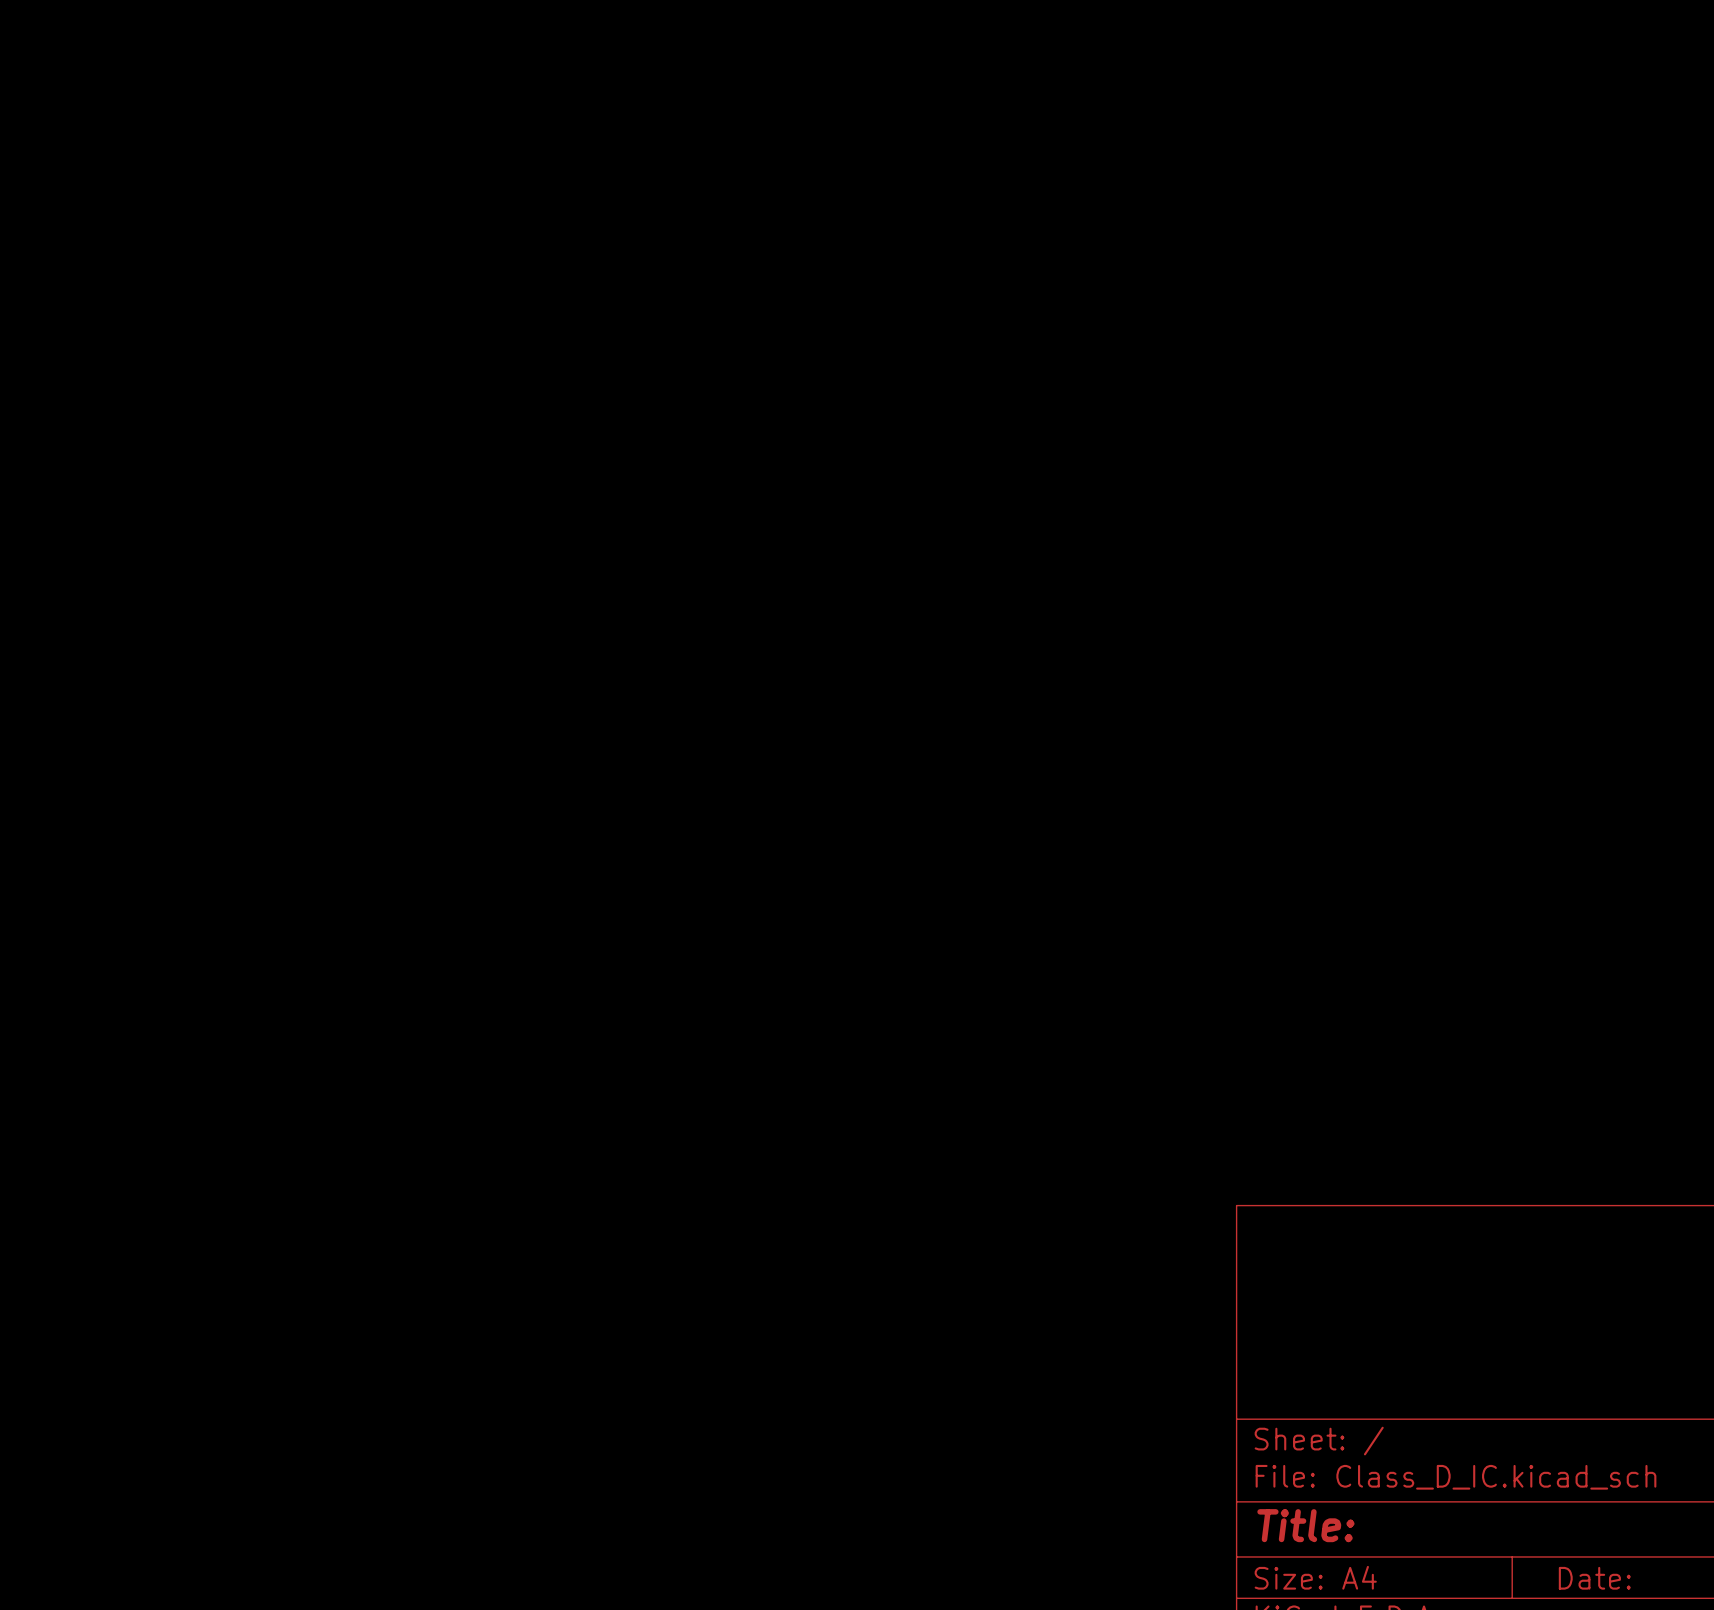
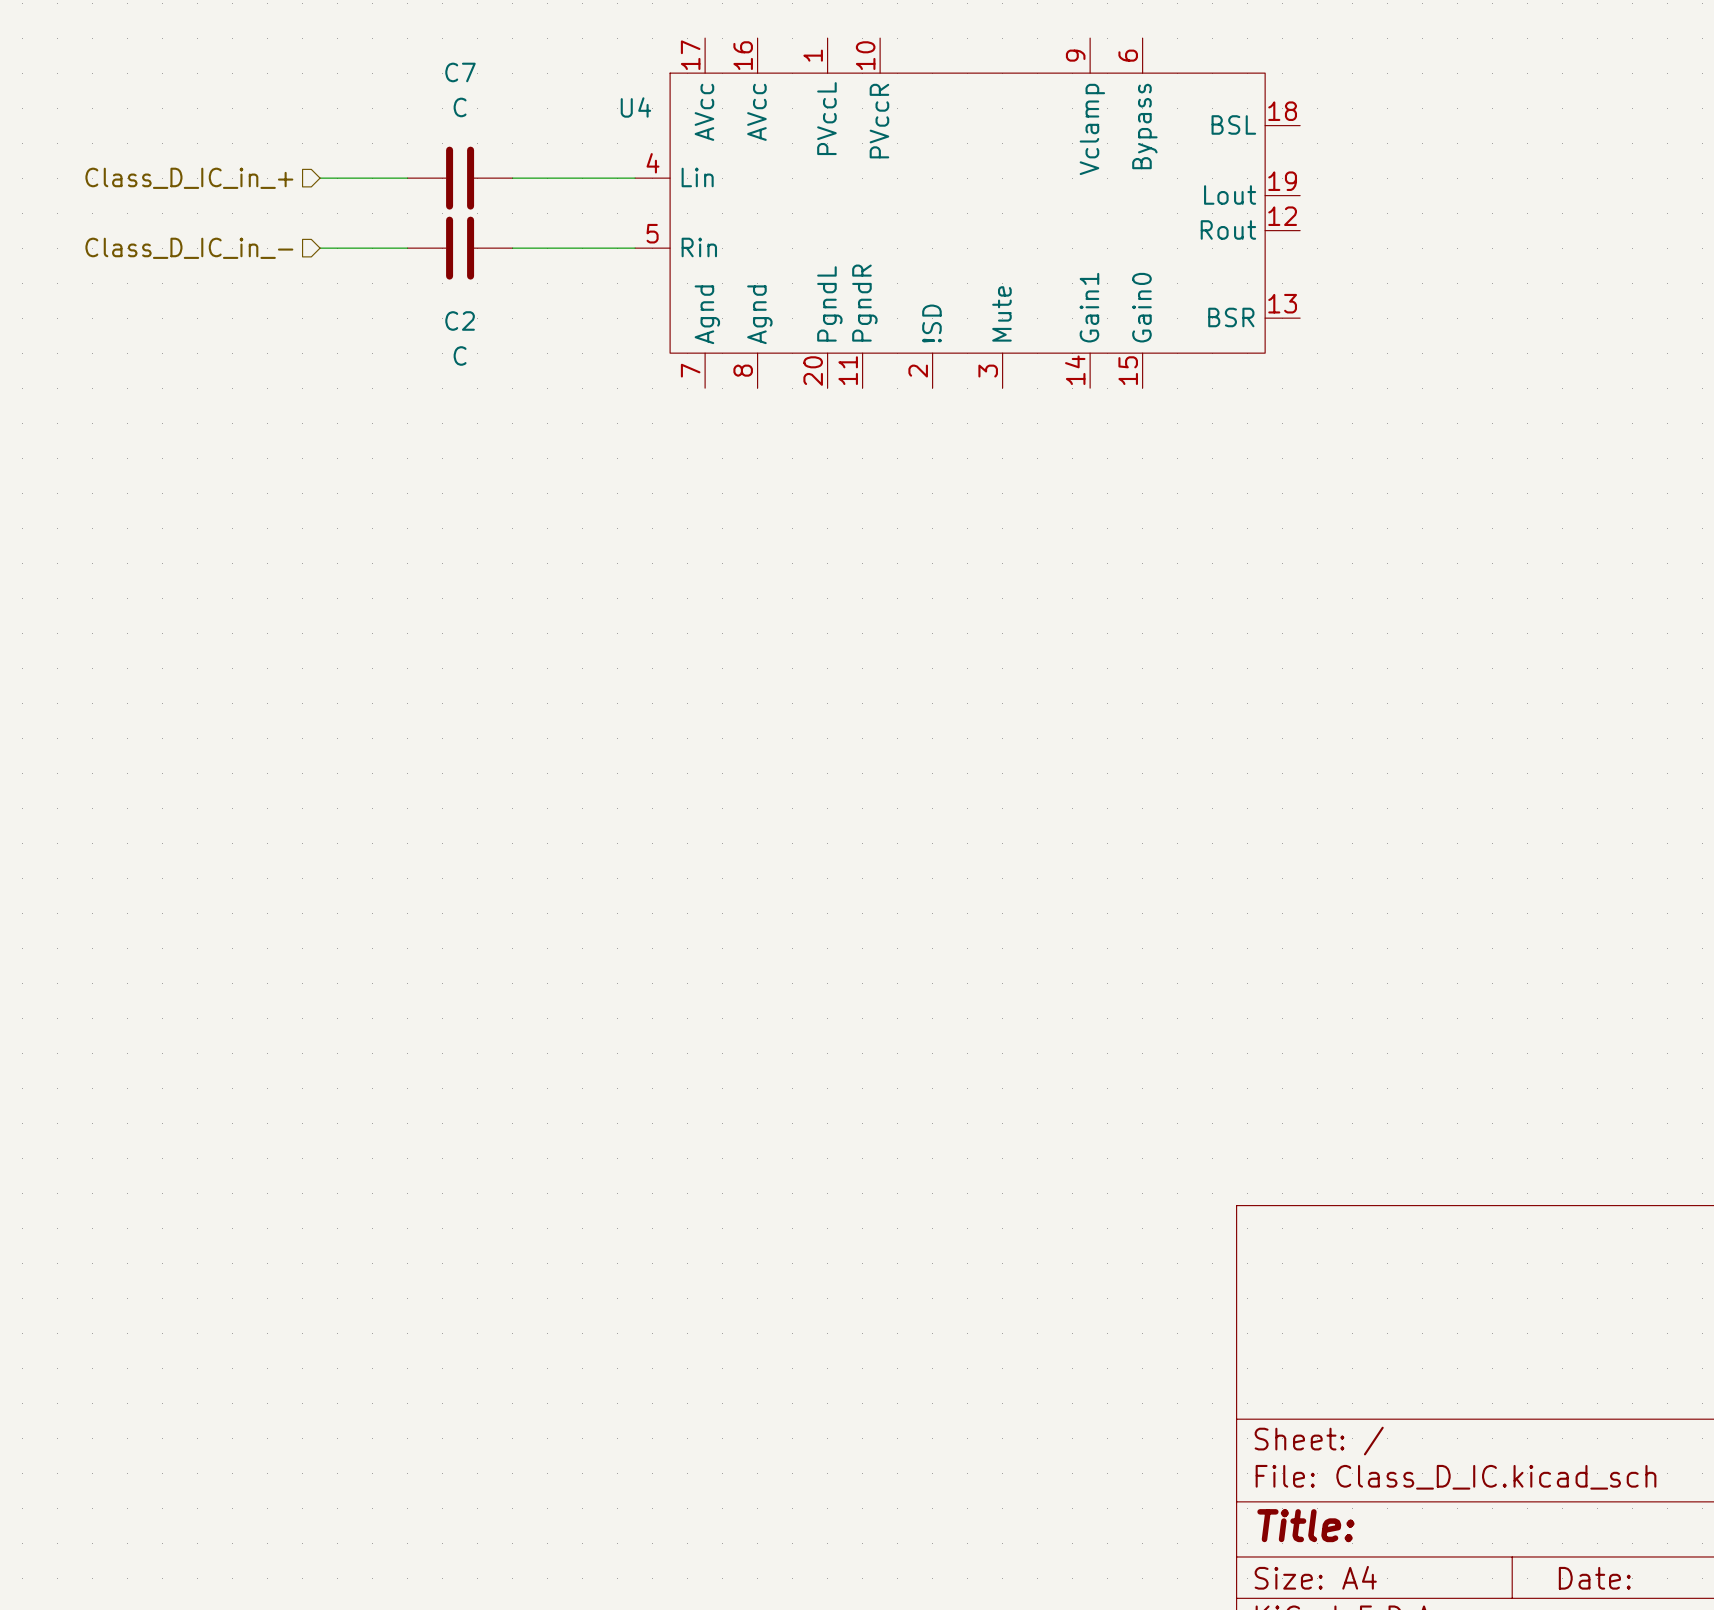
hierarchical label: none -> Class_D_IC_in_+ (189, 178)
wire: none -> (320, 178) (407, 178)
C7: none -> C (460, 178)
wire: none -> (512, 178) (635, 178)
U4: none -> (967, 213)
hierarchical label: none -> Class_D_IC_in_- (189, 248)
wire: none -> (320, 248) (407, 248)
C2: none -> C (460, 248)
wire: none -> (512, 248) (635, 248)

